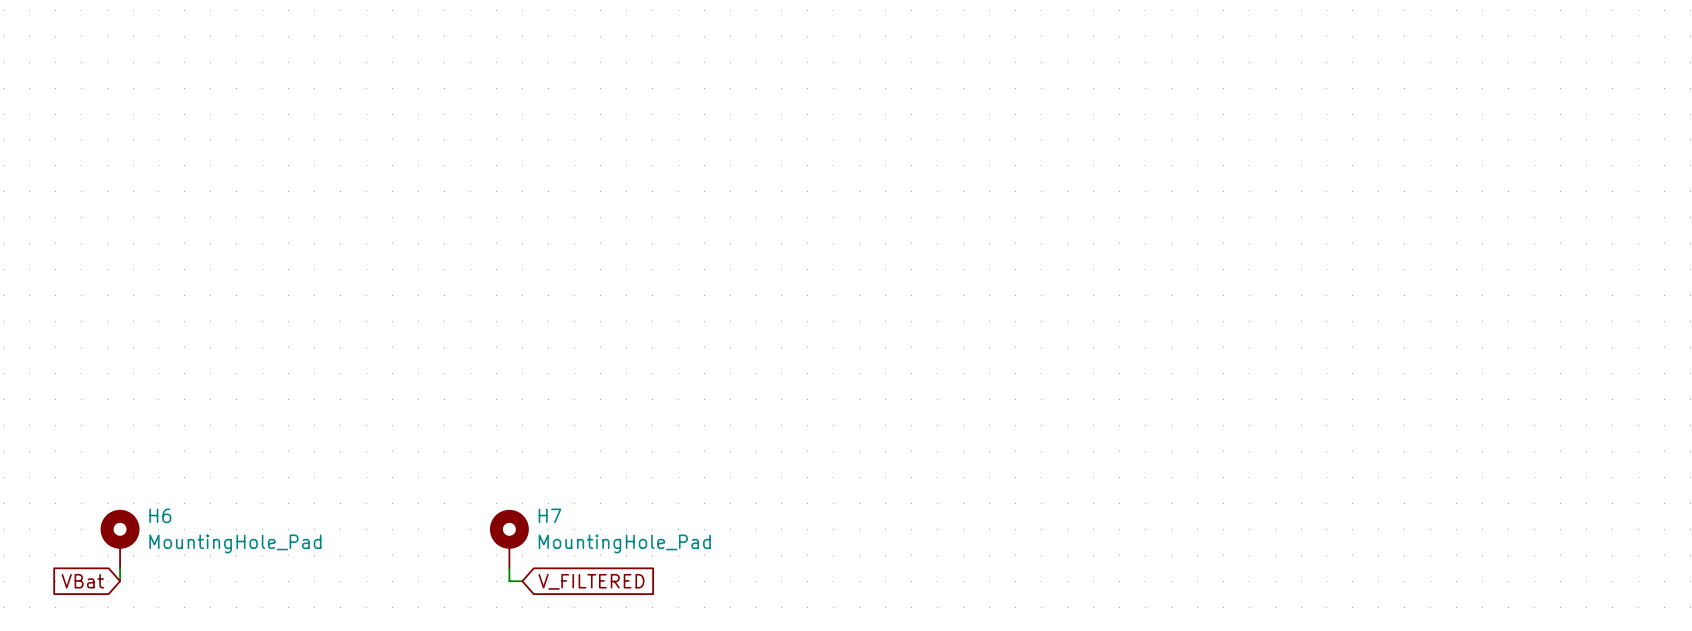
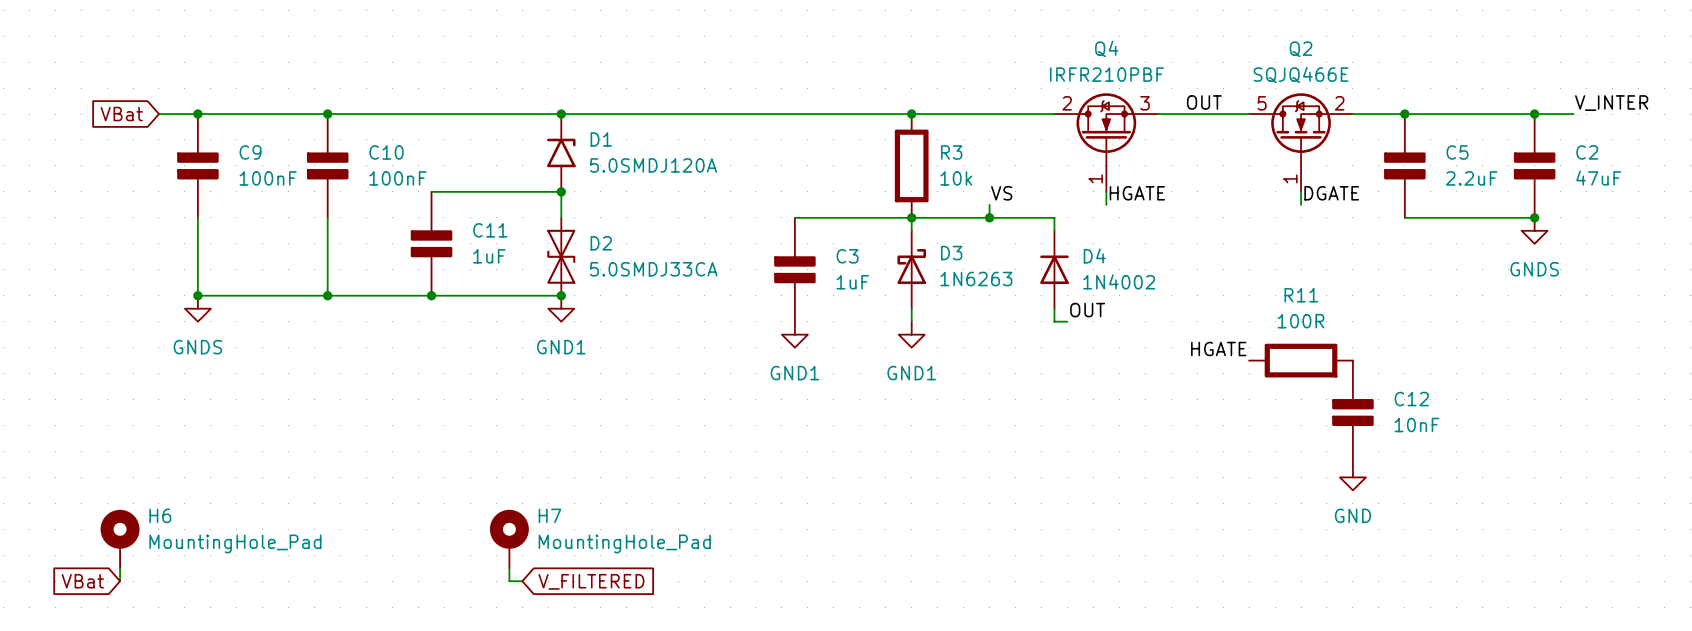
label: none -> OUT (1204, 102)
label: none -> V_INTER (1611, 103)
global label: none -> VBat (121, 114)
wire: none -> (158, 114) (1054, 114)
junction: none -> (197, 114)
junction: none -> (327, 114)
junction: none -> (561, 114)
junction: none -> (911, 114)
wire: none -> (1158, 114) (1249, 114)
wire: none -> (1352, 114) (1573, 114)
junction: none -> (1404, 114)
junction: none -> (1534, 114)
Q4: none -> IRFR210PBF (1106, 142)
Q2: none -> SQJQ466E (1301, 142)
D1: none -> 5.0SMDJ120A (561, 152)
C9: none -> 100nF (197, 165)
C10: none -> 100nF (327, 165)
R3: none -> 10k (911, 165)
C5: none -> 2.2uF (1404, 165)
C2: none -> 47uF (1534, 165)
wire: none -> (431, 191) (561, 191) (561, 217)
junction: none -> (561, 191)
wire: none -> (1106, 191) (1106, 204)
wire: none -> (1301, 191) (1301, 204)
label: none -> VS (1001, 193)
label: none -> HGATE (1137, 193)
label: none -> DGATE (1331, 193)
wire: none -> (989, 204) (989, 217)
wire: none -> (197, 217) (197, 295) (561, 295)
wire: none -> (327, 217) (327, 295)
wire: none -> (794, 217) (1054, 217) (1054, 230)
wire: none -> (911, 217) (911, 230)
junction: none -> (911, 217)
junction: none -> (989, 217)
wire: none -> (1404, 217) (1534, 217)
junction: none -> (1534, 217)
power symbol: none -> GNDS (1534, 230)
C11: none -> 1uF (431, 243)
D2: none -> 5.0SMDJ33CA (561, 256)
C3: none -> 1uF (794, 269)
D3: none -> 1N6263 (911, 269)
D4: none -> 1N4002 (1054, 269)
junction: none -> (197, 295)
junction: none -> (327, 295)
junction: none -> (431, 295)
junction: none -> (561, 295)
power symbol: none -> GNDS (197, 308)
power symbol: none -> GND1 (561, 308)
wire: none -> (911, 308) (911, 321)
wire: none -> (1054, 308) (1054, 321) (1067, 321)
label: none -> OUT (1087, 310)
power symbol: none -> GND1 (794, 334)
power symbol: none -> GND1 (911, 334)
label: none -> HGATE (1218, 349)
R11: none -> 100R (1301, 360)
C12: none -> 10nF (1352, 412)
power symbol: none -> GND (1352, 477)

